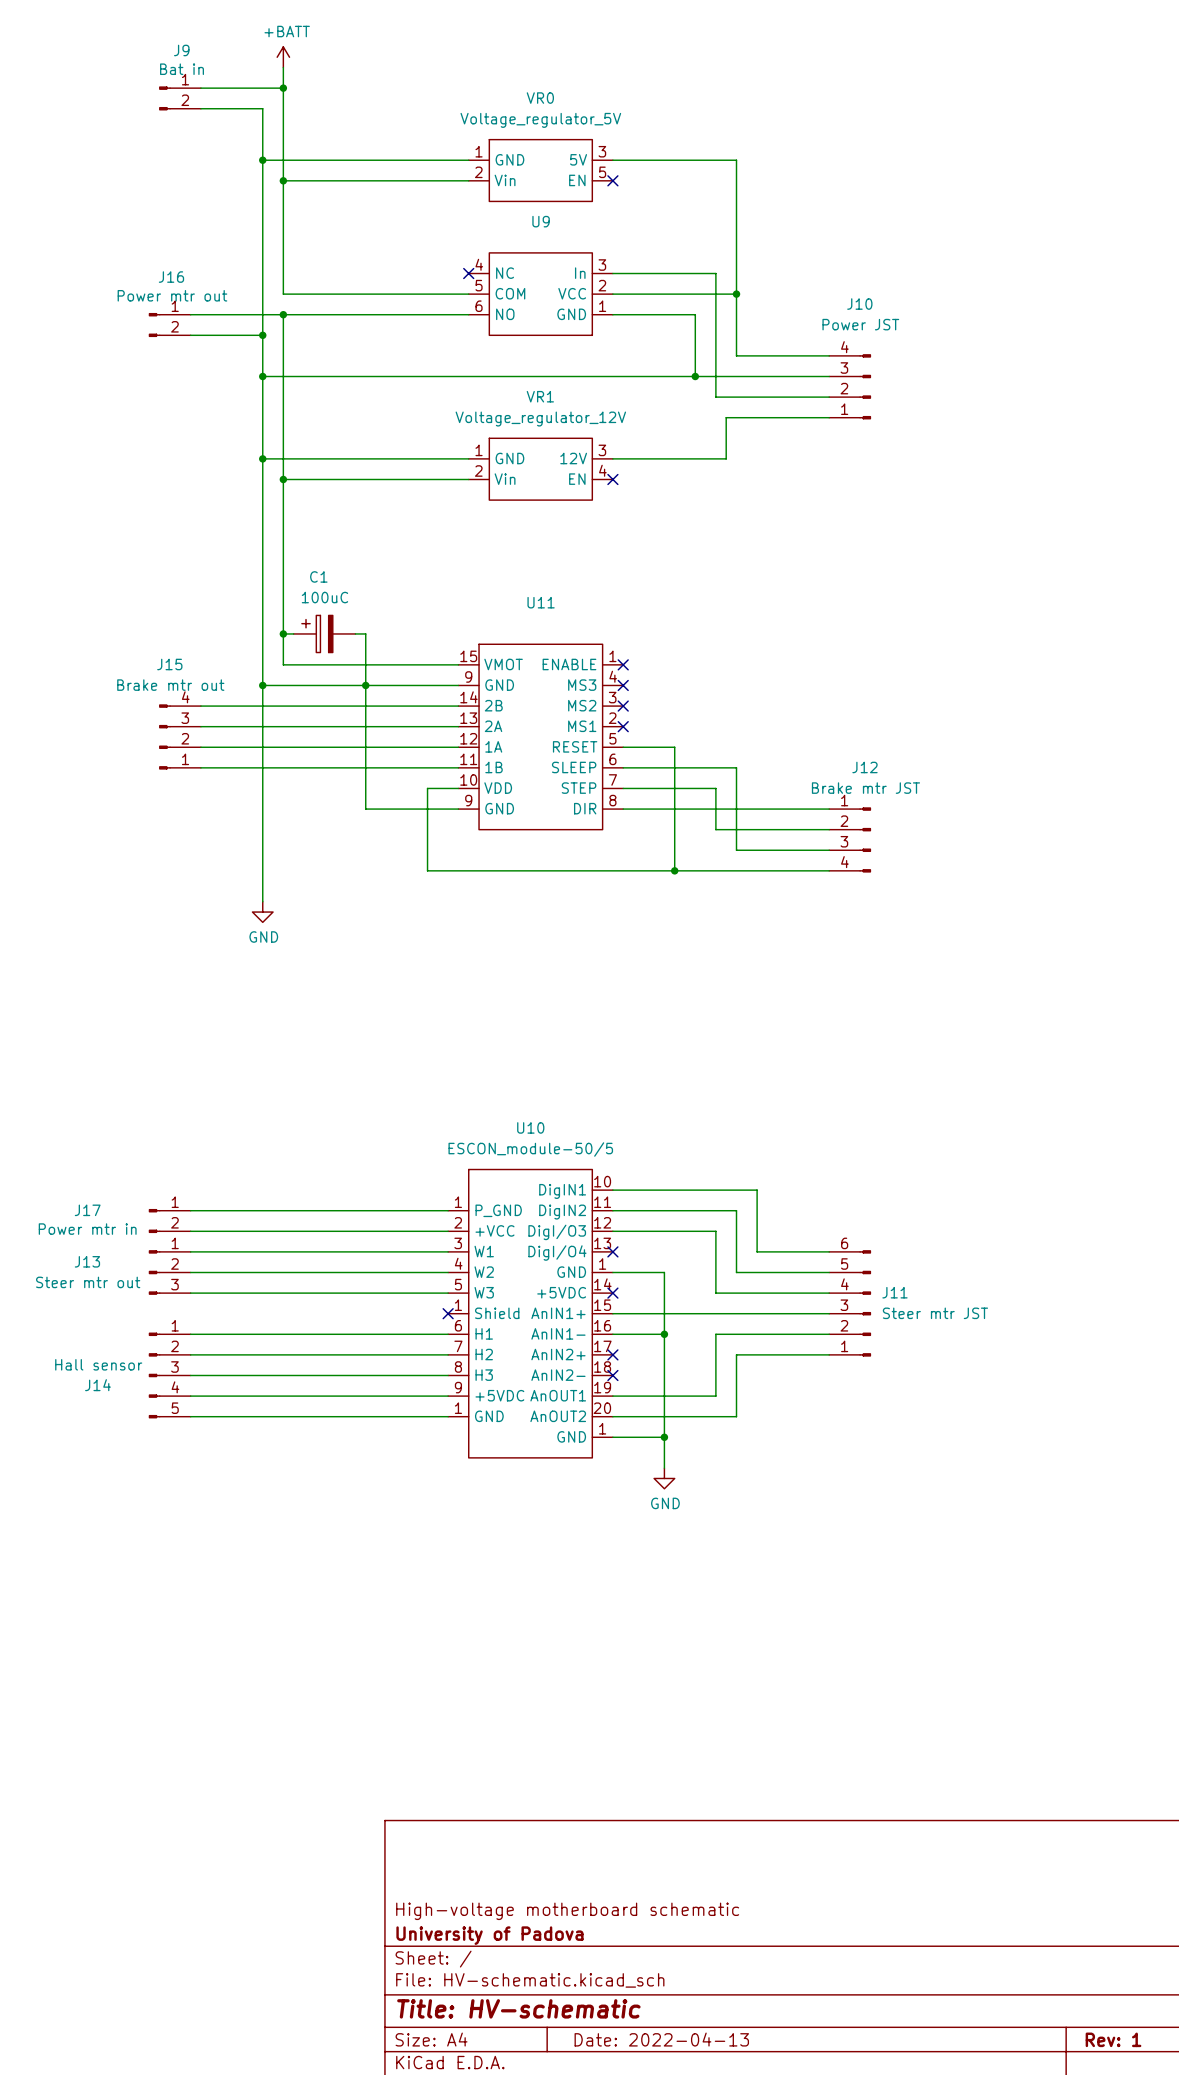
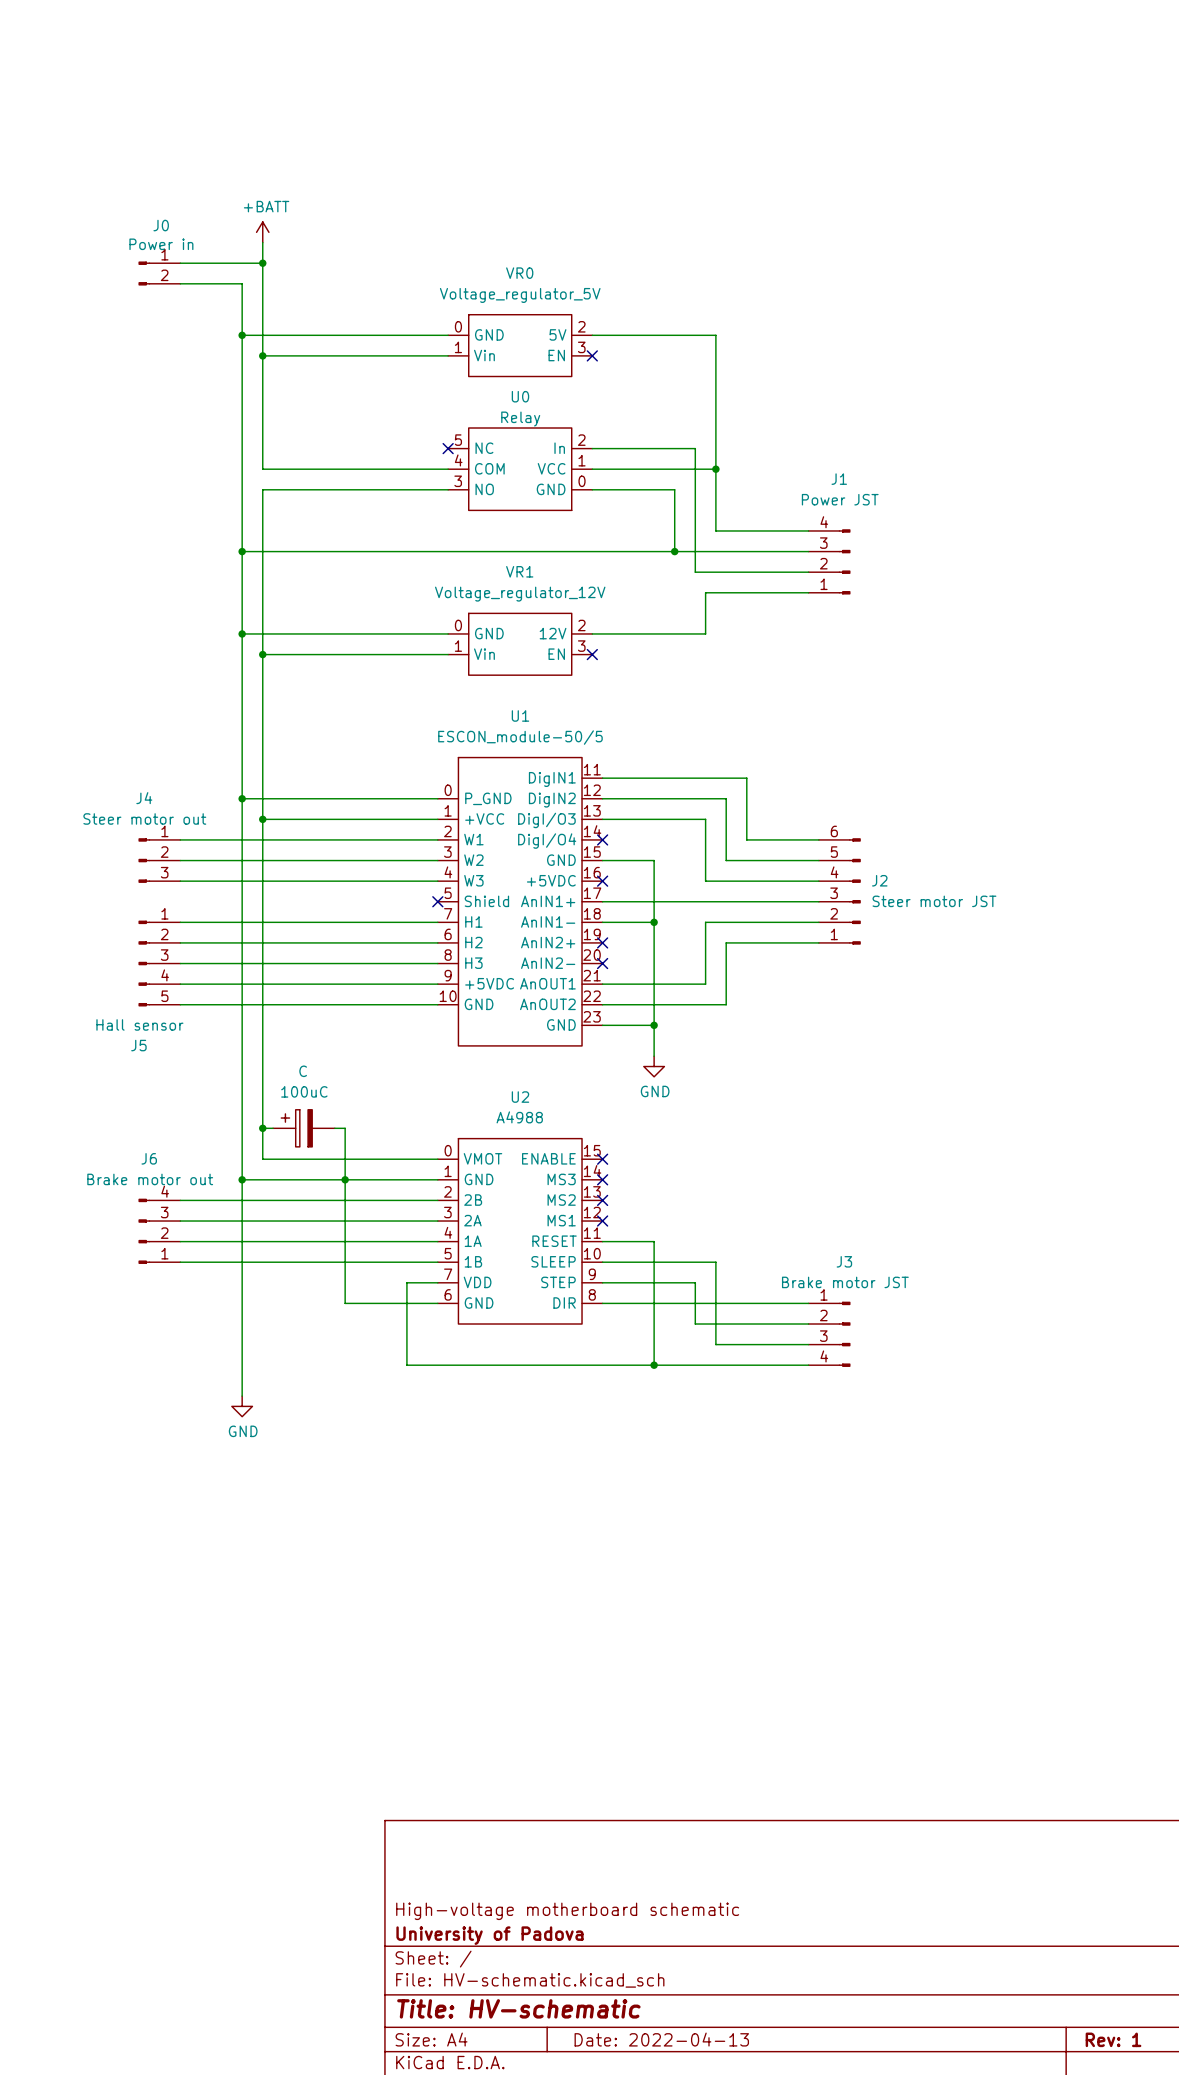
power symbol position: +BATT (283, 57) -> +BATT (262, 232)
wire: (283, 67) (283, 294) (468, 294) -> none
wire: (200, 88) (283, 88) -> (180, 263) (262, 263)
junction: (283, 88) -> none
J9: Bat in (180, 98) -> none
wire: (200, 108) (262, 108) (262, 242) -> none
VR0 pin number: 1 (479, 151) -> 0 (458, 326)
VR0 pin number: 3 (602, 151) -> 2 (581, 326)
wire: (262, 160) (468, 160) -> none
junction: (262, 160) -> none
wire: (612, 160) (736, 160) (736, 355) (829, 355) -> none
VR0 position: (540, 170) -> (520, 345)
VR0 pin number: 2 (478, 172) -> 1 (458, 347)
VR0 pin number: 5 (602, 172) -> 3 (581, 347)
wire: (283, 180) (468, 180) -> (262, 355) (448, 355)
junction: (283, 180) -> none
no-connect mark: (612, 180) -> none
junction: none -> (262, 263)
J0: none -> Power in (159, 273)
no-connect mark: (468, 273) -> none
wire: (612, 273) (715, 273) (715, 335) -> (592, 335) (715, 335)
wire: none -> (180, 283) (242, 283) (242, 1396)
U9: (540, 294) -> none
wire: (612, 294) (736, 294) -> (592, 469) (715, 469)
junction: (736, 294) -> none
wire: (190, 314) (468, 314) -> none
wire: (283, 314) (283, 664) (458, 664) -> none
junction: (283, 314) -> none
wire: (612, 314) (695, 314) (695, 376) -> (592, 489) (674, 489) (674, 551)
J16: Power mtr out (169, 325) -> none
wire: (190, 335) (242, 335) -> none
junction: none -> (242, 335)
wire: none -> (262, 335) (448, 335)
junction: (262, 335) -> none
junction: none -> (262, 355)
no-connect mark: none -> (592, 355)
wire: (262, 376) (829, 376) -> (242, 551) (808, 551)
junction: (262, 376) -> none
junction: (695, 376) -> none
J10: Power JST (850, 386) -> none
wire: (715, 397) (829, 397) -> (715, 397) (715, 530) (808, 530)
wire: (829, 417) (726, 417) (726, 458) (612, 458) -> (808, 592) (705, 592) (705, 633) (592, 633)
no-connect mark: none -> (448, 448)
wire: none -> (592, 448) (695, 448) (695, 572) (808, 572)
VR1 pin number: 1 (479, 450) -> 0 (458, 625)
VR1 pin number: 3 (602, 450) -> 2 (581, 625)
wire: (262, 458) (468, 458) -> none
junction: (262, 458) -> none
wire: (262, 469) (262, 489) -> (262, 469) (448, 469)
U0: none -> Relay (520, 469)
VR1 position: (540, 469) -> (520, 644)
junction: none -> (715, 469)
VR1 pin number: 4 (602, 470) -> 3 (581, 646)
VR1 pin number: 2 (478, 471) -> 1 (458, 646)
wire: (283, 479) (468, 479) -> (262, 654) (448, 654)
junction: (283, 479) -> none
no-connect mark: (612, 479) -> none
wire: none -> (262, 489) (448, 489)
junction: none -> (242, 551)
junction: none -> (674, 551)
J1: none -> Power JST (829, 561)
wire: none -> (242, 633) (283, 633)
junction: none -> (242, 633)
junction: (283, 633) -> none
C1: 100uC (324, 633) -> none
wire: (365, 633) (365, 809) (458, 809) -> (365, 633) (448, 633)
junction: none -> (262, 654)
no-connect mark: none -> (592, 654)
no-connect mark: (623, 664) -> none
wire: (262, 685) (458, 685) -> (242, 798) (437, 798)
junction: (262, 685) -> none
junction: (365, 685) -> none
no-connect mark: (623, 685) -> none
wire: (200, 706) (458, 706) -> (180, 881) (437, 881)
no-connect mark: (623, 706) -> none
wire: (200, 726) (458, 726) -> (180, 839) (437, 839)
no-connect mark: (623, 726) -> none
J15: Brake mtr out (180, 736) -> none
U11: (540, 736) -> none
wire: (200, 747) (458, 747) -> (180, 922) (437, 922)
wire: (623, 747) (674, 747) (674, 870) -> none
wire: (200, 767) (458, 767) -> (180, 942) (437, 942)
wire: (623, 767) (736, 767) (736, 850) (829, 850) -> none
wire: none -> (602, 778) (746, 778) (746, 839) (818, 839)
wire: (458, 788) (427, 788) (427, 870) (829, 870) -> none
wire: (623, 788) (715, 788) (715, 829) (829, 829) -> none
junction: none -> (242, 798)
wire: none -> (602, 798) (726, 798) (726, 860) (818, 860)
wire: (623, 809) (829, 809) -> none
wire: none -> (262, 819) (437, 819)
junction: none -> (262, 819)
wire: none -> (602, 819) (705, 819) (705, 881) (818, 881)
no-connect mark: none -> (602, 839)
J12: Brake mtr JST (850, 839) -> none
J4: none -> Steer motor out (159, 860)
wire: none -> (180, 860) (437, 860)
wire: none -> (602, 860) (654, 860) (654, 1056)
junction: (674, 870) -> none
no-connect mark: none -> (602, 881)
J2: none -> Steer motor JST (839, 891)
wire: none -> (262, 901) (262, 1159) (437, 1159)
no-connect mark: none -> (437, 901)
U1: none -> ESCON_module-50/5 (520, 901)
wire: none -> (602, 901) (818, 901)
power symbol: GND (262, 912) -> none
wire: none -> (602, 922) (654, 922)
junction: none -> (654, 922)
wire: none -> (818, 922) (705, 922) (705, 984) (602, 984)
no-connect mark: none -> (602, 942)
wire: none -> (818, 942) (726, 942) (726, 1004) (602, 1004)
J5: none -> Hall sensor (159, 963)
wire: none -> (180, 963) (437, 963)
no-connect mark: none -> (602, 963)
wire: none -> (180, 984) (437, 984)
wire: none -> (180, 1004) (437, 1004)
wire: none -> (602, 1025) (654, 1025)
junction: none -> (654, 1025)
power symbol: none -> GND (654, 1066)
wire: none -> (262, 1128) (273, 1128)
junction: none -> (262, 1128)
C: none -> 100uC (303, 1128)
wire: none -> (334, 1128) (345, 1128) (345, 1303) (437, 1303)
no-connect mark: none -> (602, 1159)
wire: none -> (242, 1179) (437, 1179)
junction: none -> (242, 1179)
junction: none -> (345, 1179)
no-connect mark: none -> (602, 1179)
wire: (612, 1190) (757, 1190) (757, 1251) (829, 1251) -> none
no-connect mark: none -> (602, 1200)
wire: (190, 1210) (448, 1210) -> (180, 1200) (437, 1200)
wire: (612, 1210) (736, 1210) (736, 1272) (829, 1272) -> none
J17: Power mtr in (169, 1221) -> none
no-connect mark: none -> (602, 1221)
J6: none -> Brake motor out (159, 1231)
wire: (190, 1231) (448, 1231) -> (180, 1221) (437, 1221)
U2: none -> A4988 (520, 1231)
wire: (612, 1231) (715, 1231) (715, 1262) -> (602, 1262) (715, 1262)
wire: none -> (602, 1241) (654, 1241) (654, 1365)
wire: (190, 1251) (448, 1251) -> (180, 1241) (437, 1241)
no-connect mark: (612, 1251) -> none
J13: Steer mtr out (169, 1272) -> none
wire: (190, 1272) (448, 1272) -> (180, 1262) (437, 1262)
wire: (612, 1272) (664, 1272) (664, 1468) -> none
wire: none -> (437, 1282) (406, 1282) (406, 1365) (808, 1365)
wire: none -> (602, 1282) (695, 1282) (695, 1324) (808, 1324)
wire: (190, 1293) (448, 1293) -> none
no-connect mark: (612, 1293) -> none
wire: (715, 1293) (829, 1293) -> (715, 1293) (715, 1334)
wire: none -> (602, 1303) (808, 1303)
J11: Steer mtr JST (850, 1303) -> none
no-connect mark: (448, 1313) -> none
U10: ESCON_module-50/5 (530, 1313) -> none
wire: (612, 1313) (829, 1313) -> none
wire: (190, 1334) (448, 1334) -> none
wire: (612, 1334) (664, 1334) -> none
junction position: (664, 1334) -> (654, 1365)
wire: (715, 1334) (829, 1334) -> none
J3: none -> Brake motor JST (829, 1334)
wire: (715, 1344) (715, 1396) (612, 1396) -> (715, 1344) (808, 1344)
wire: (190, 1354) (448, 1354) -> none
no-connect mark: (612, 1354) -> none
wire: (829, 1354) (736, 1354) (736, 1416) (612, 1416) -> none
J14: Hall sensor (169, 1375) -> none
wire: (190, 1375) (448, 1375) -> none
no-connect mark: (612, 1375) -> none
wire: (190, 1396) (448, 1396) -> none
power symbol: none -> GND (242, 1406)
wire: (190, 1416) (448, 1416) -> none
wire: (612, 1437) (664, 1437) -> none
junction: (664, 1437) -> none
power symbol: GND (664, 1478) -> none

